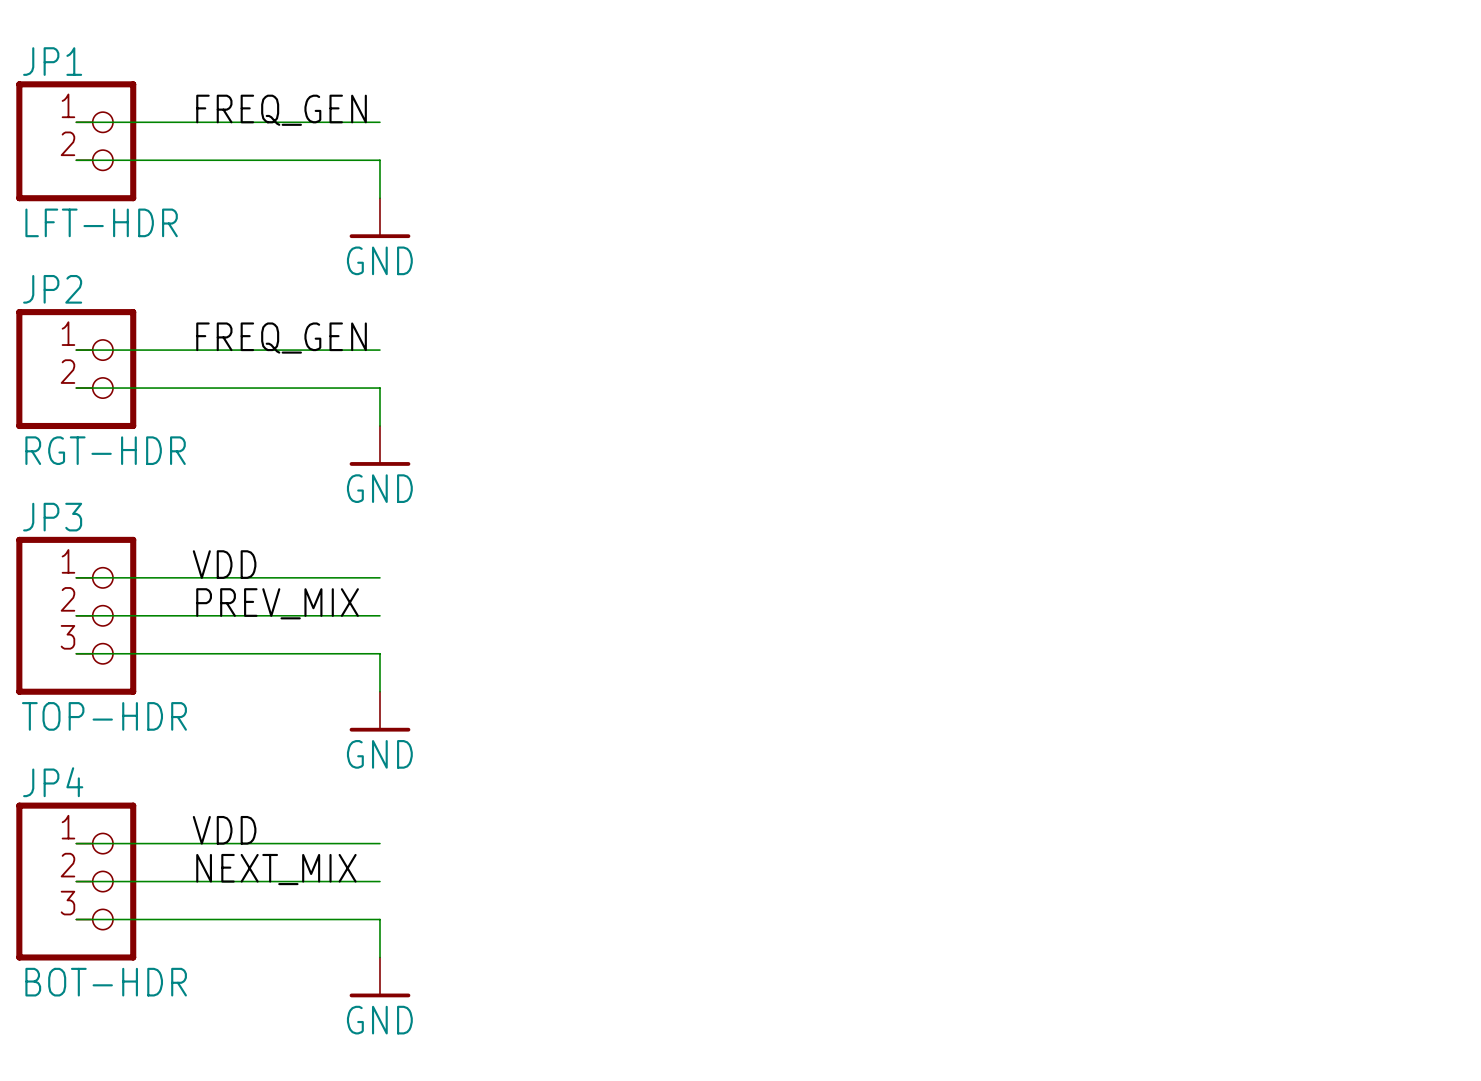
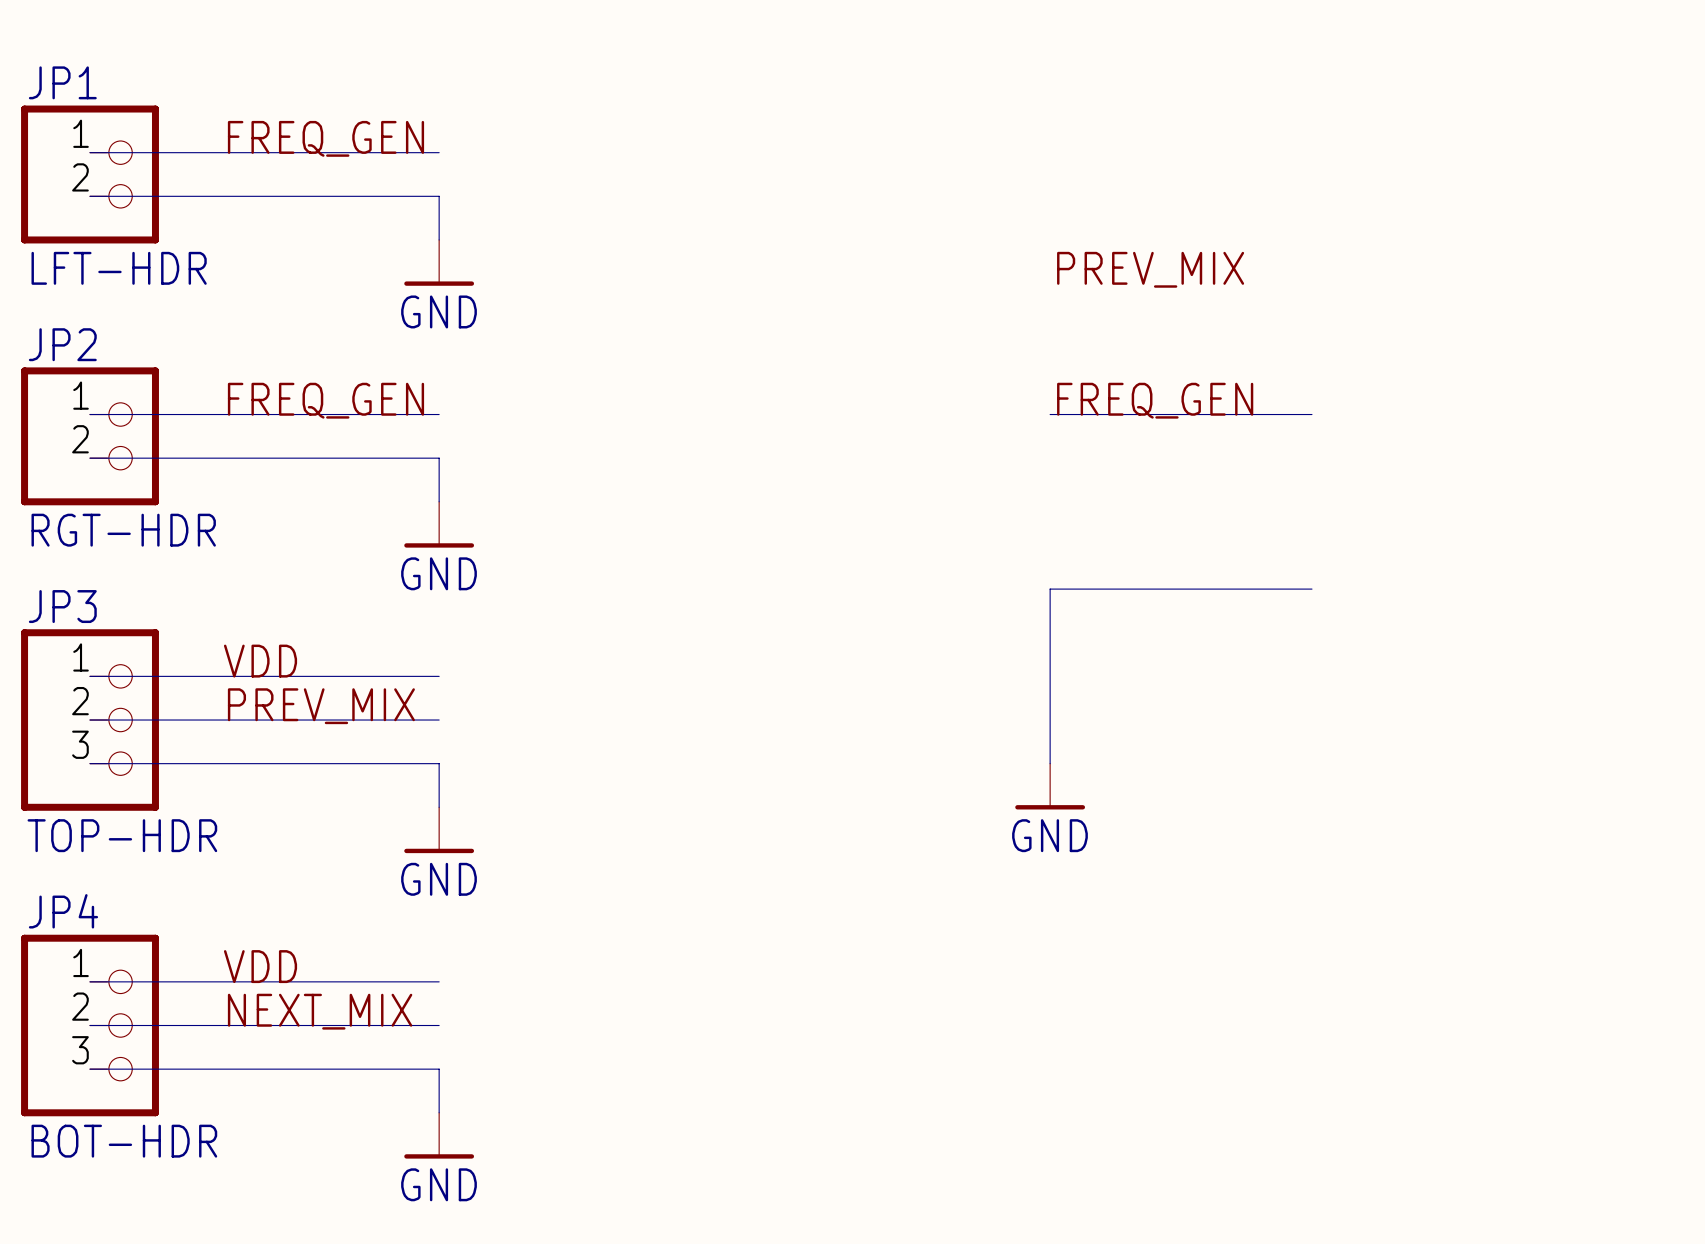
label: none -> PREV_MIX (1150, 269)
label: none -> FREQ_GEN (1155, 400)
wire: none -> (1050, 414) (1311, 414)
wire: none -> (1311, 589) (1050, 589) (1050, 763)
power symbol: none -> GND (1050, 786)

